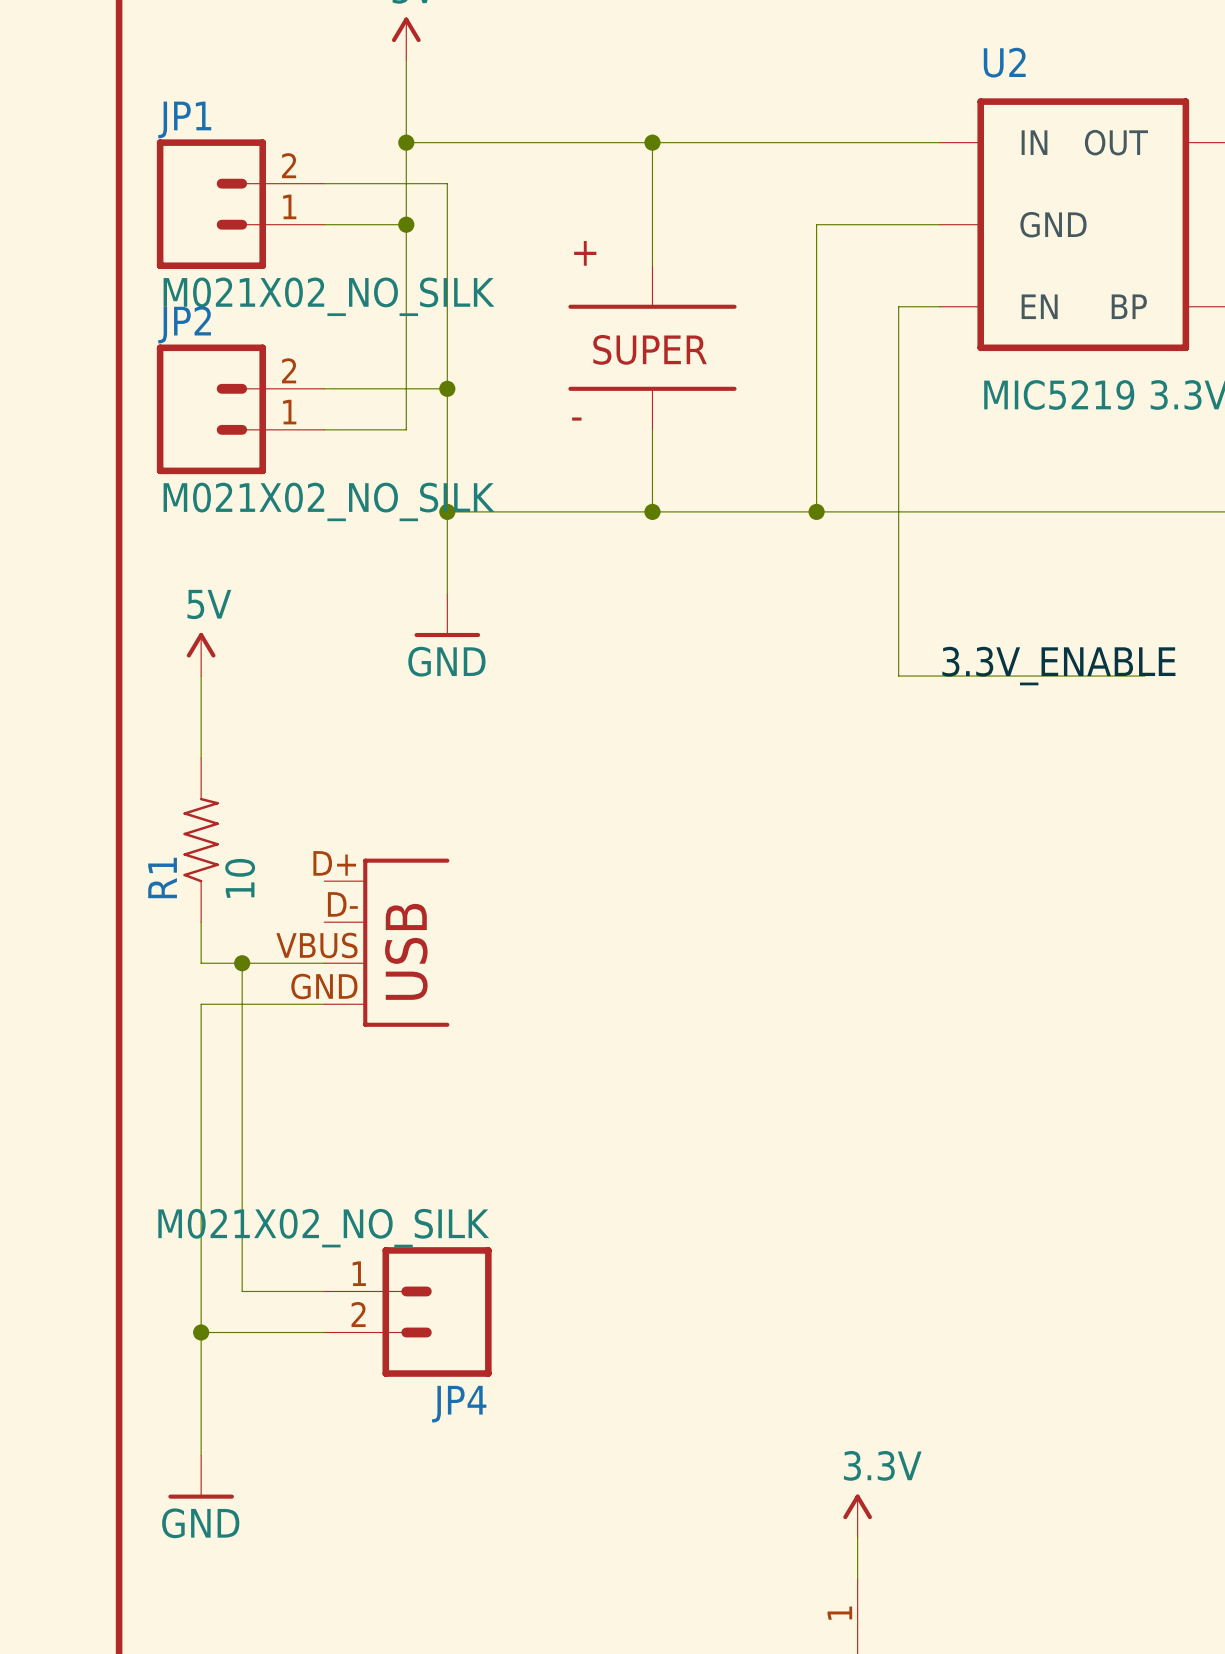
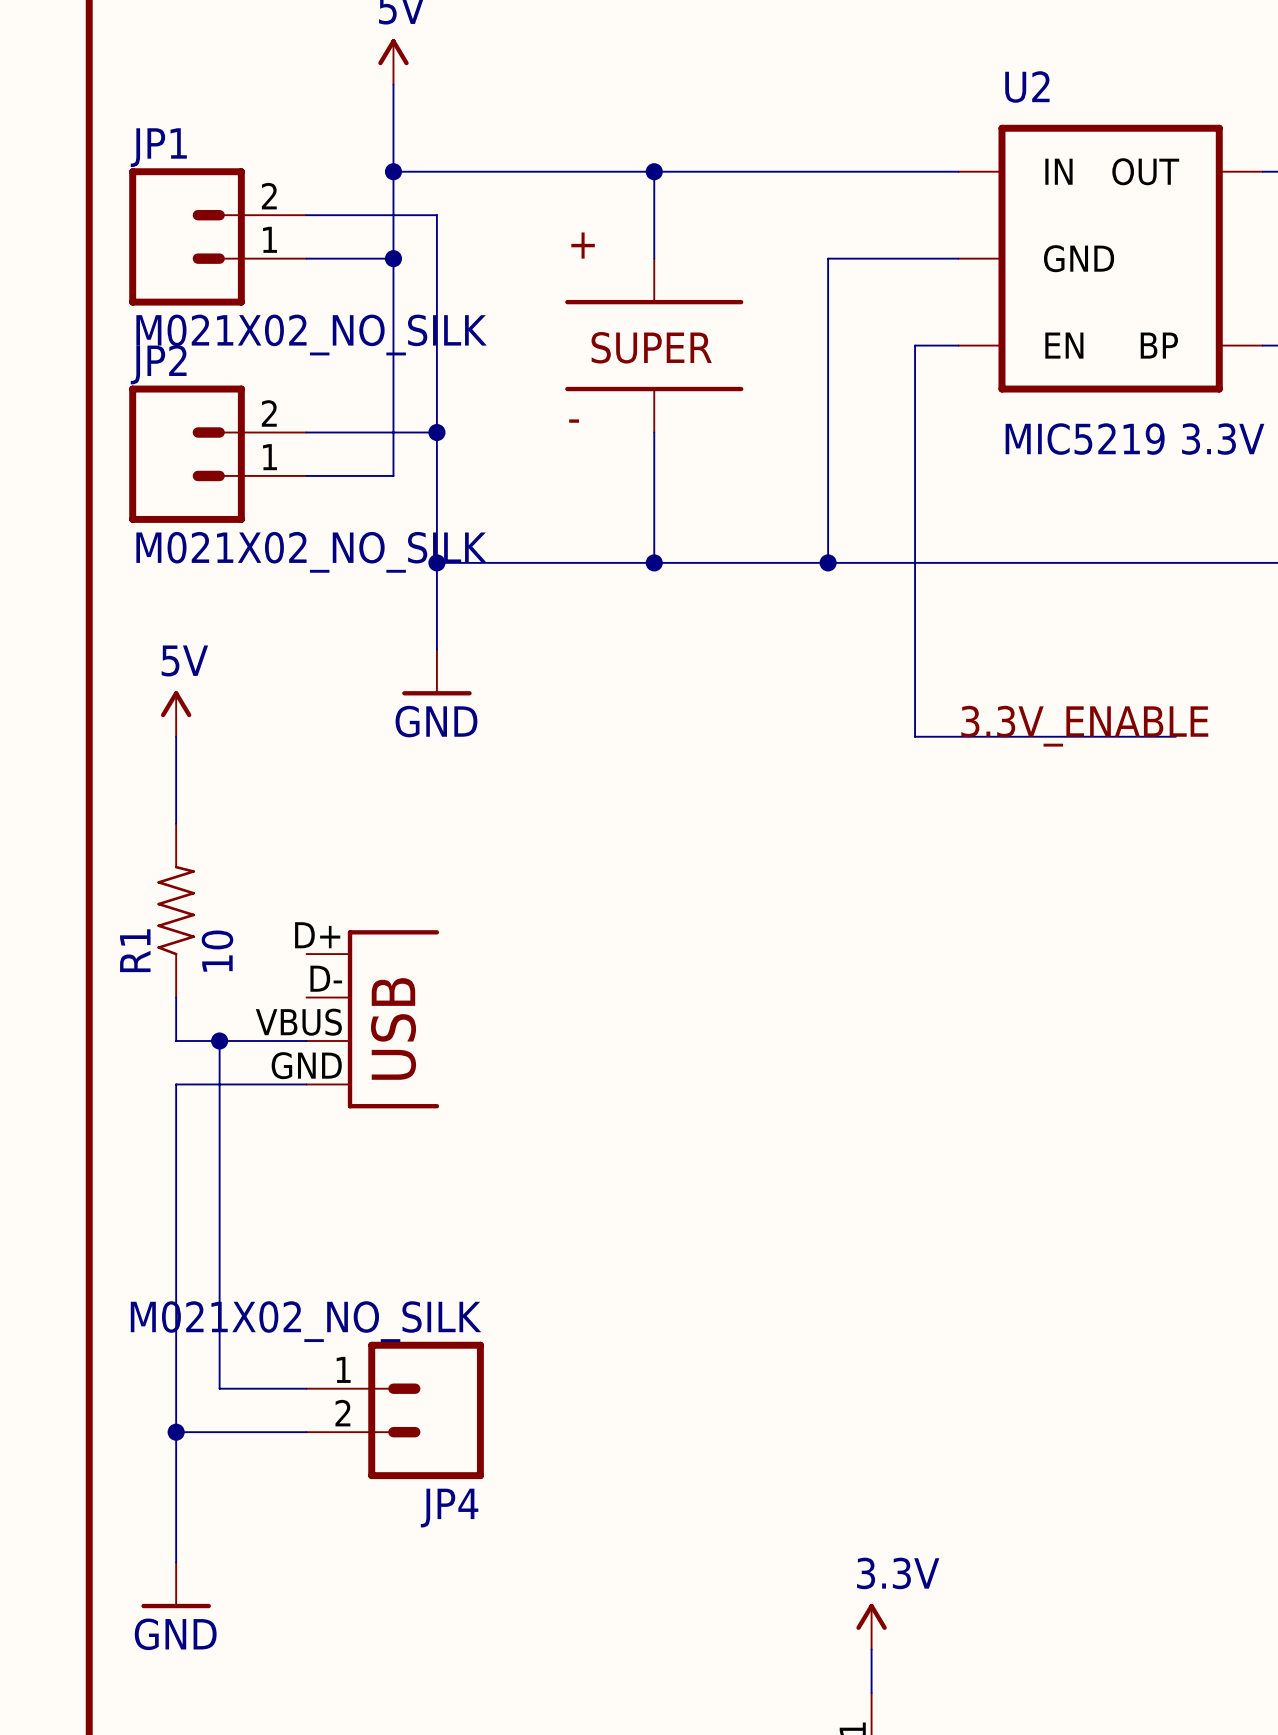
part position: (652, 347) -> (654, 345)

